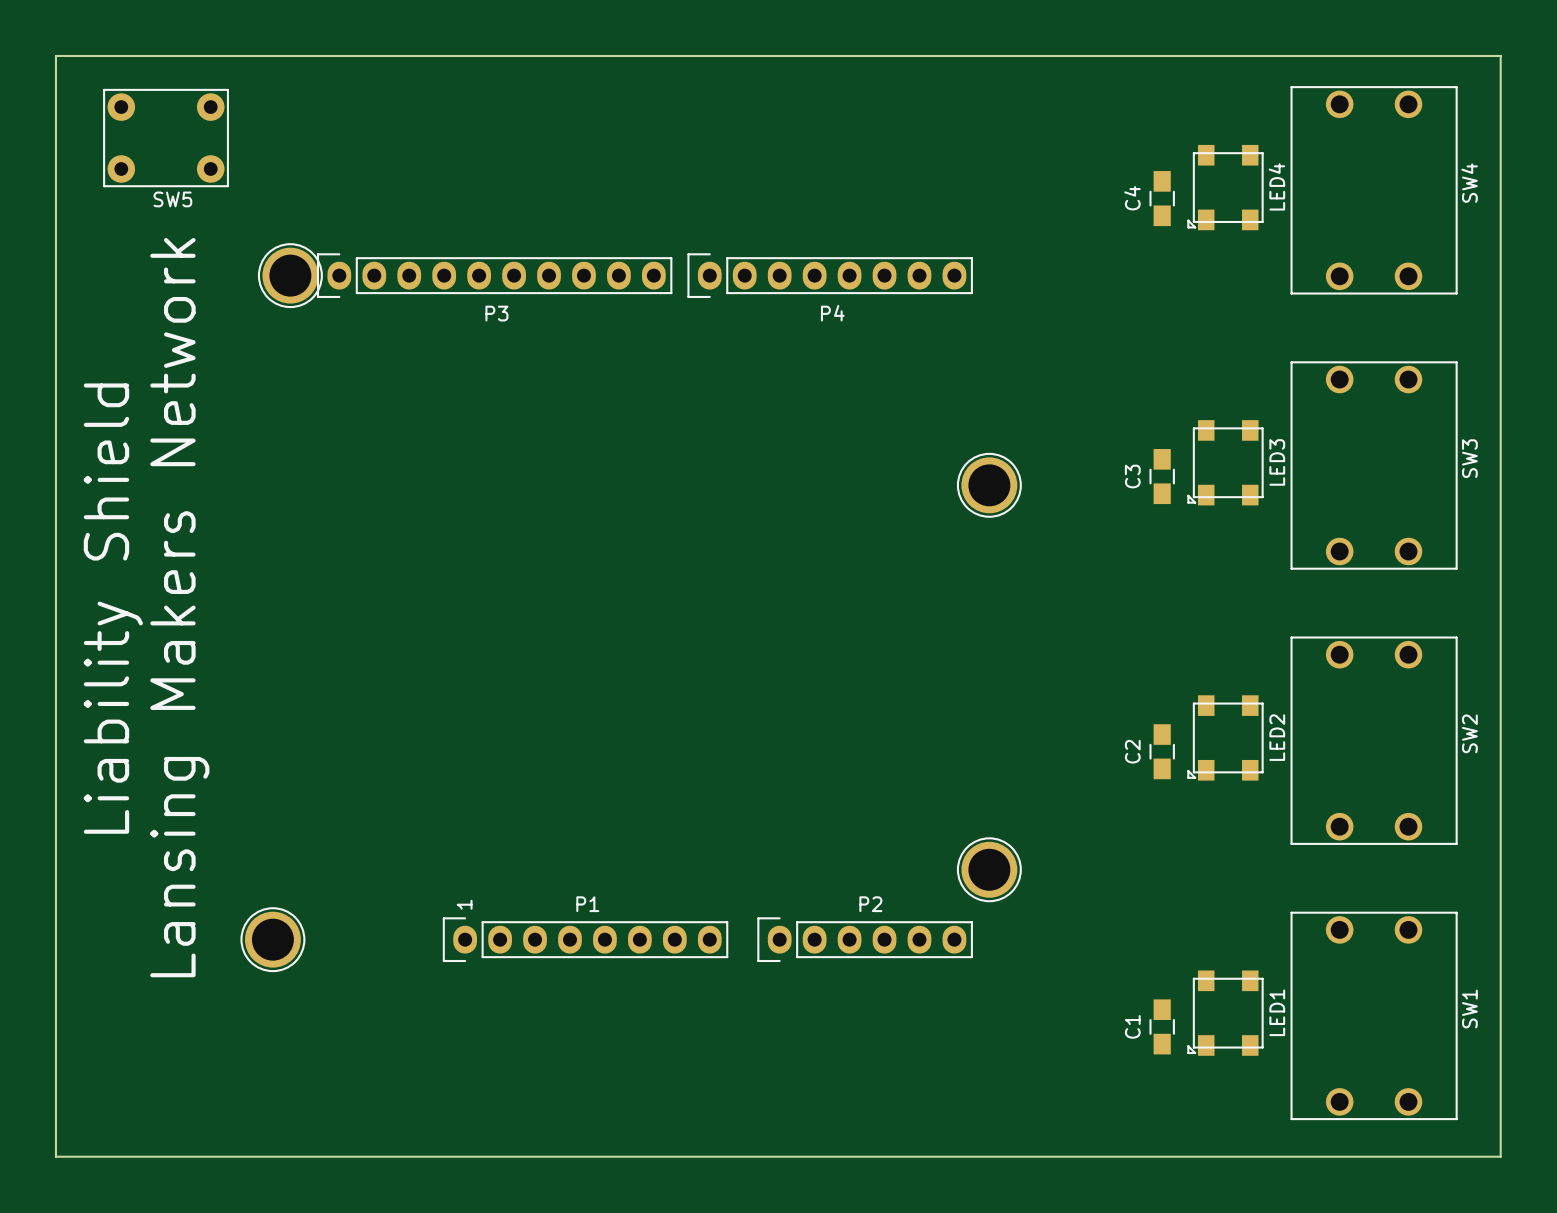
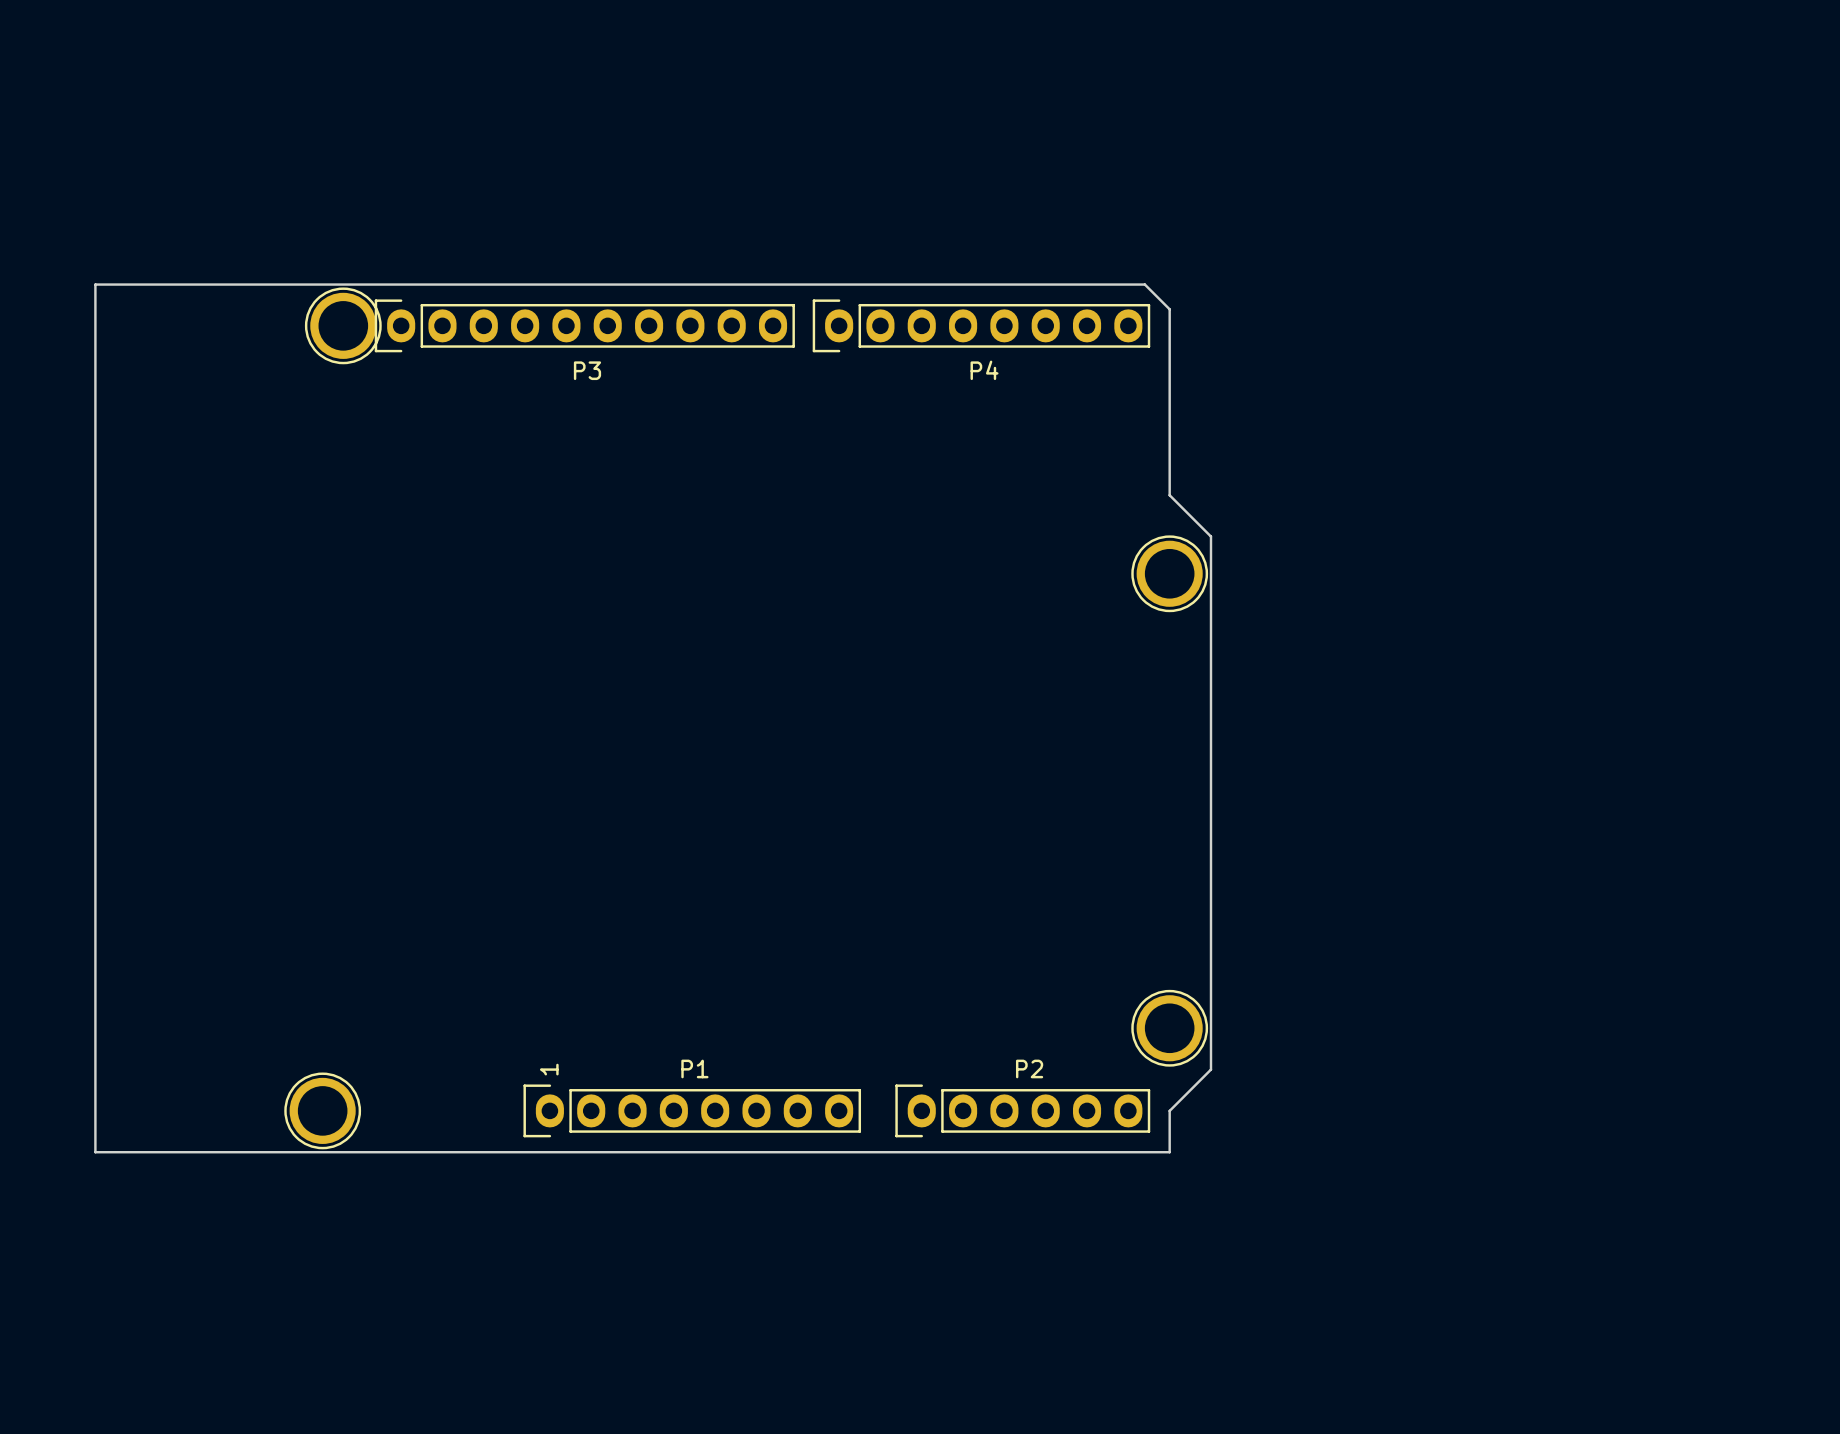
board edge: (55, 55) (55, 1156) (1500, 1156) (1500, 55) (55, 55) -> none
SW5: (166, 138) -> none
LED4: (1225, 187) -> none
SW4: (1374, 190) -> none
C4: (1162, 198) -> none
board edge: none -> (95, 284) (95, 1152) (1169, 1152) (1169, 1110) (1210, 1069) (1210, 536) (1169, 495) (1169, 309) (1144, 284) (95, 284)
LED3: (1225, 462) -> none
SW3: (1374, 465) -> none
C3: (1162, 476) -> none
text: Lansing Makers Network (179, 607) -> none
text: Liability Shield (113, 608) -> none
LED2: (1225, 737) -> none
SW2: (1374, 740) -> none
C2: (1162, 751) -> none
LED1: (1225, 1013) -> none
SW1: (1374, 1015) -> none
C1: (1162, 1026) -> none

